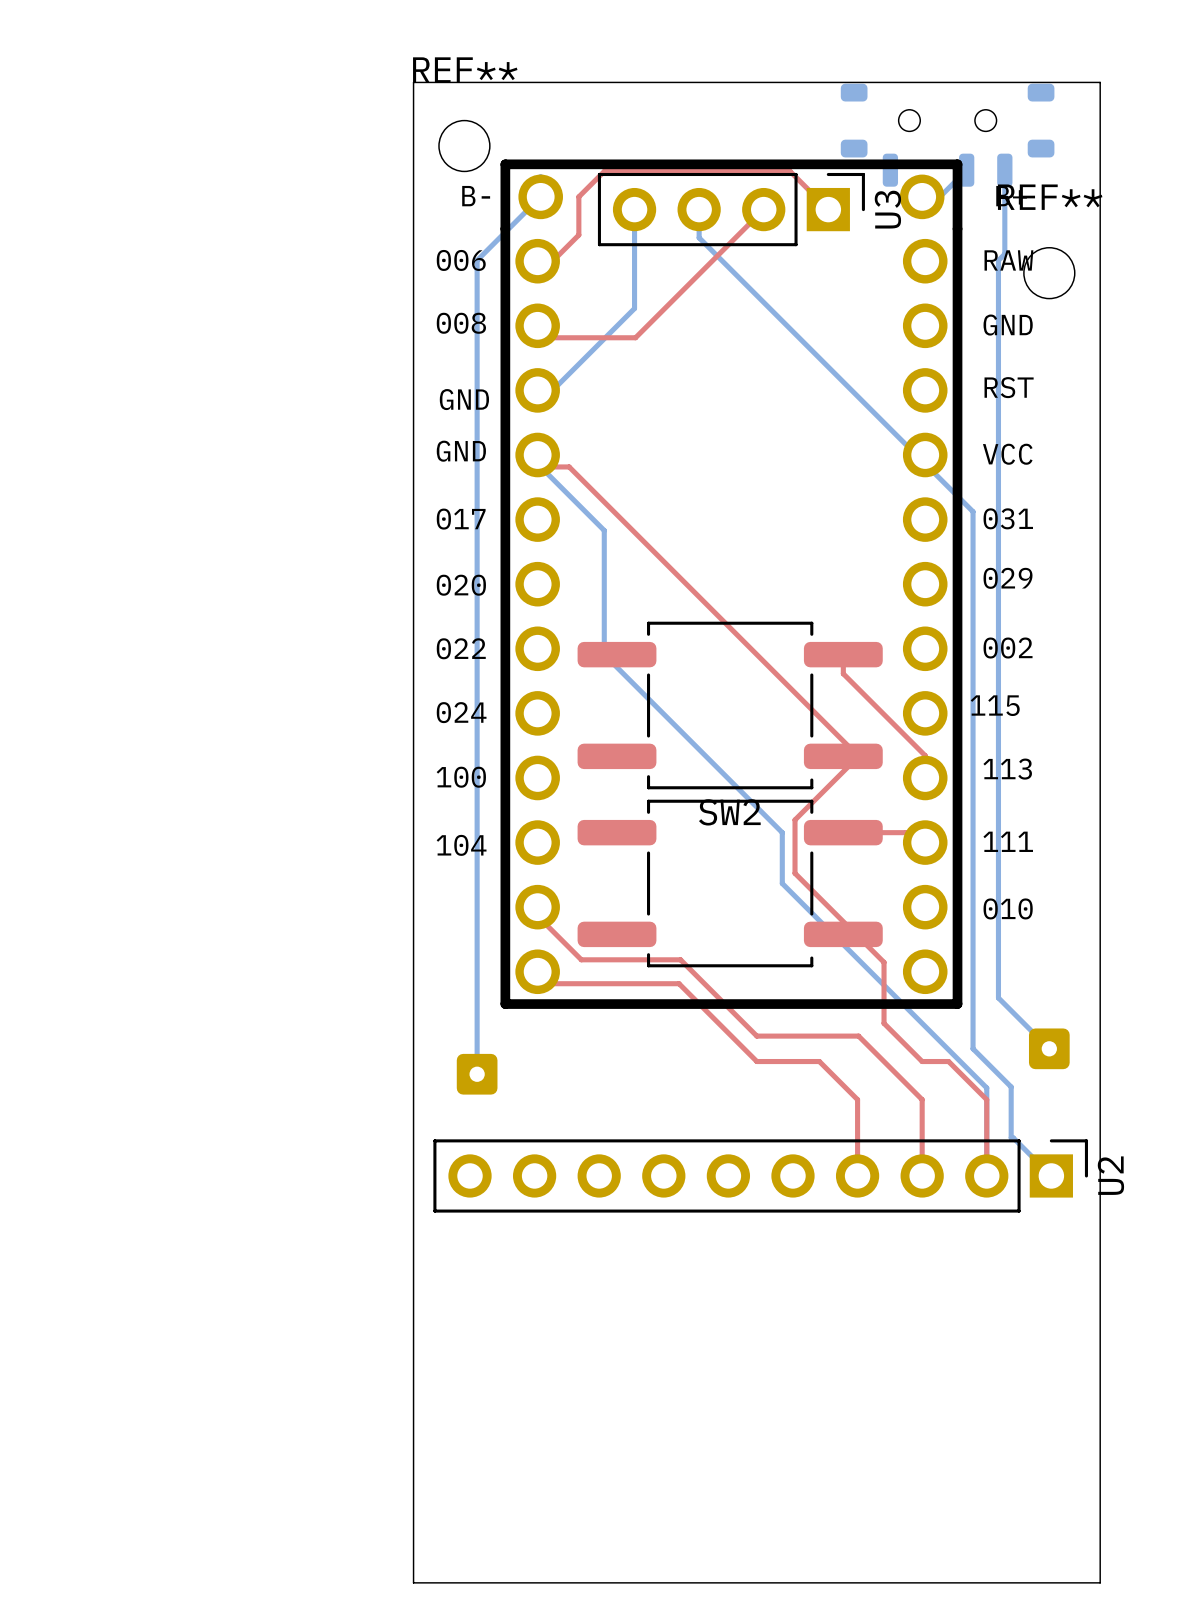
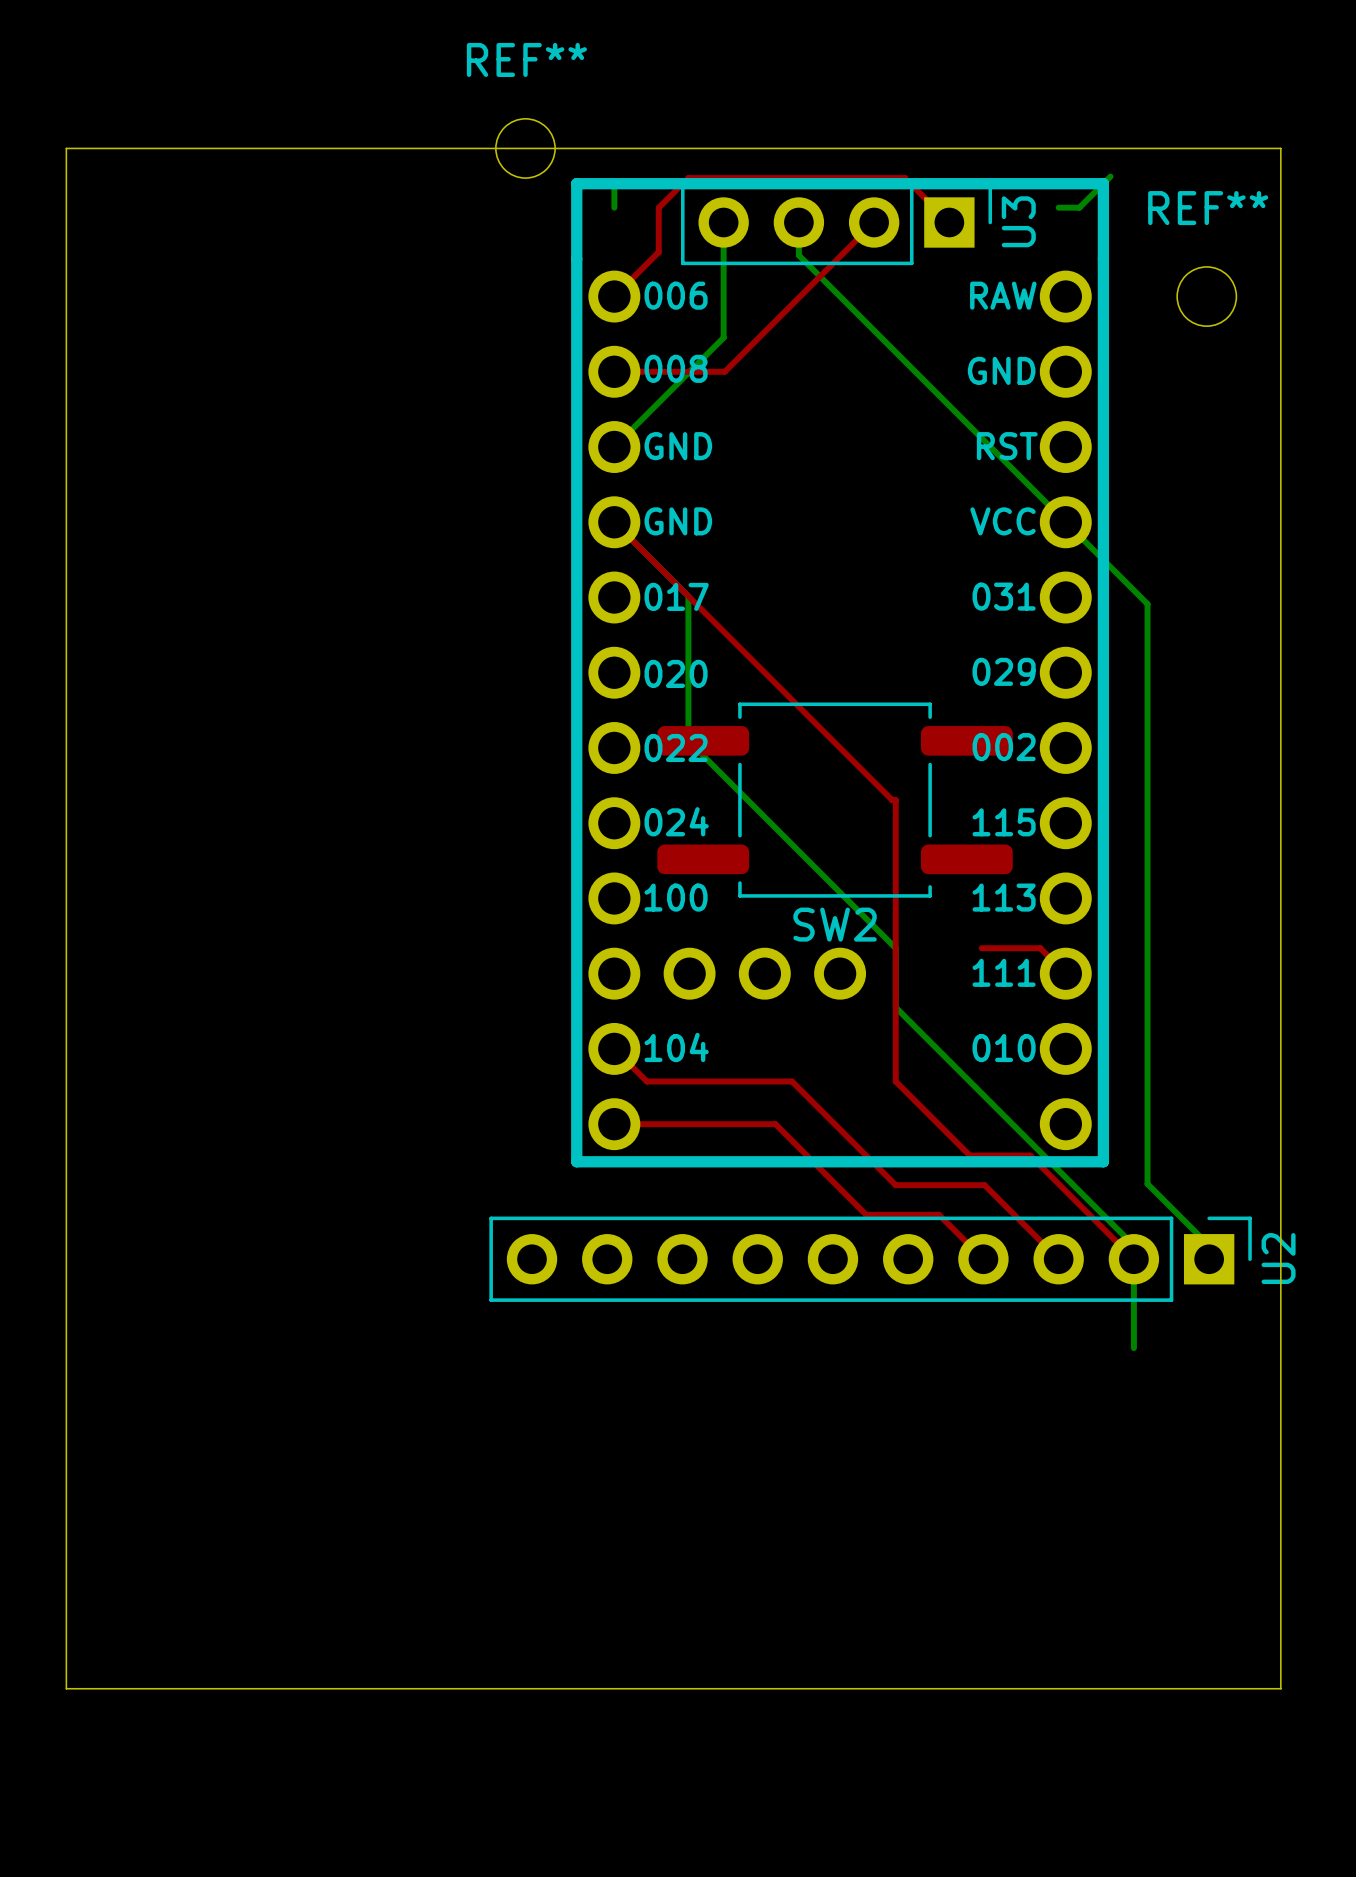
board edge: (413, 82) (1100, 82) (1100, 1582) (413, 1582) (413, 82) -> (66, 148) (66, 1688) (1280, 1688) (1280, 148) (66, 148)
part: (947, 135) -> none
part footprint: [500, 159, 963, 1009] -> [571, 178, 1110, 1168]
bottom track: (1004, 170) (1004, 254) (998, 260) (998, 537) -> (1117, 574) (1147, 604)
bottom track: (540, 196) (477, 260) (477, 1074) -> none
text position: GND (464, 399) -> GND (678, 446)
top track: (540, 466) (569, 466) (858, 756) (795, 819) (795, 873) (884, 962) (884, 1023) (922, 1061) (948, 1061) -> (614, 522) (892, 800) (895, 800) (895, 1081) (969, 1155) (1030, 1155) (1089, 1214)
bottom track: (973, 511) (973, 1048) (1011, 1086) (1011, 1137) (1051, 1175) -> none
top track: (843, 654) (843, 673) (925, 755) (925, 777) -> none
part: (730, 883) -> none
top track: (568, 947) (581, 959) (680, 959) (756, 1036) (782, 1036) -> (646, 1081) (792, 1081) (895, 1185)
bottom track: (998, 997) (1049, 1048) -> (1147, 1140) (1147, 1184) (1201, 1237)
part: (1049, 1048) -> none
part: (477, 1074) -> none
top track: (857, 1099) (857, 1175) -> none
top track: (922, 1099) (922, 1175) -> none
top track: (986, 1099) (986, 1175) -> none
U2 position: (760, 1175) -> (870, 1259)

